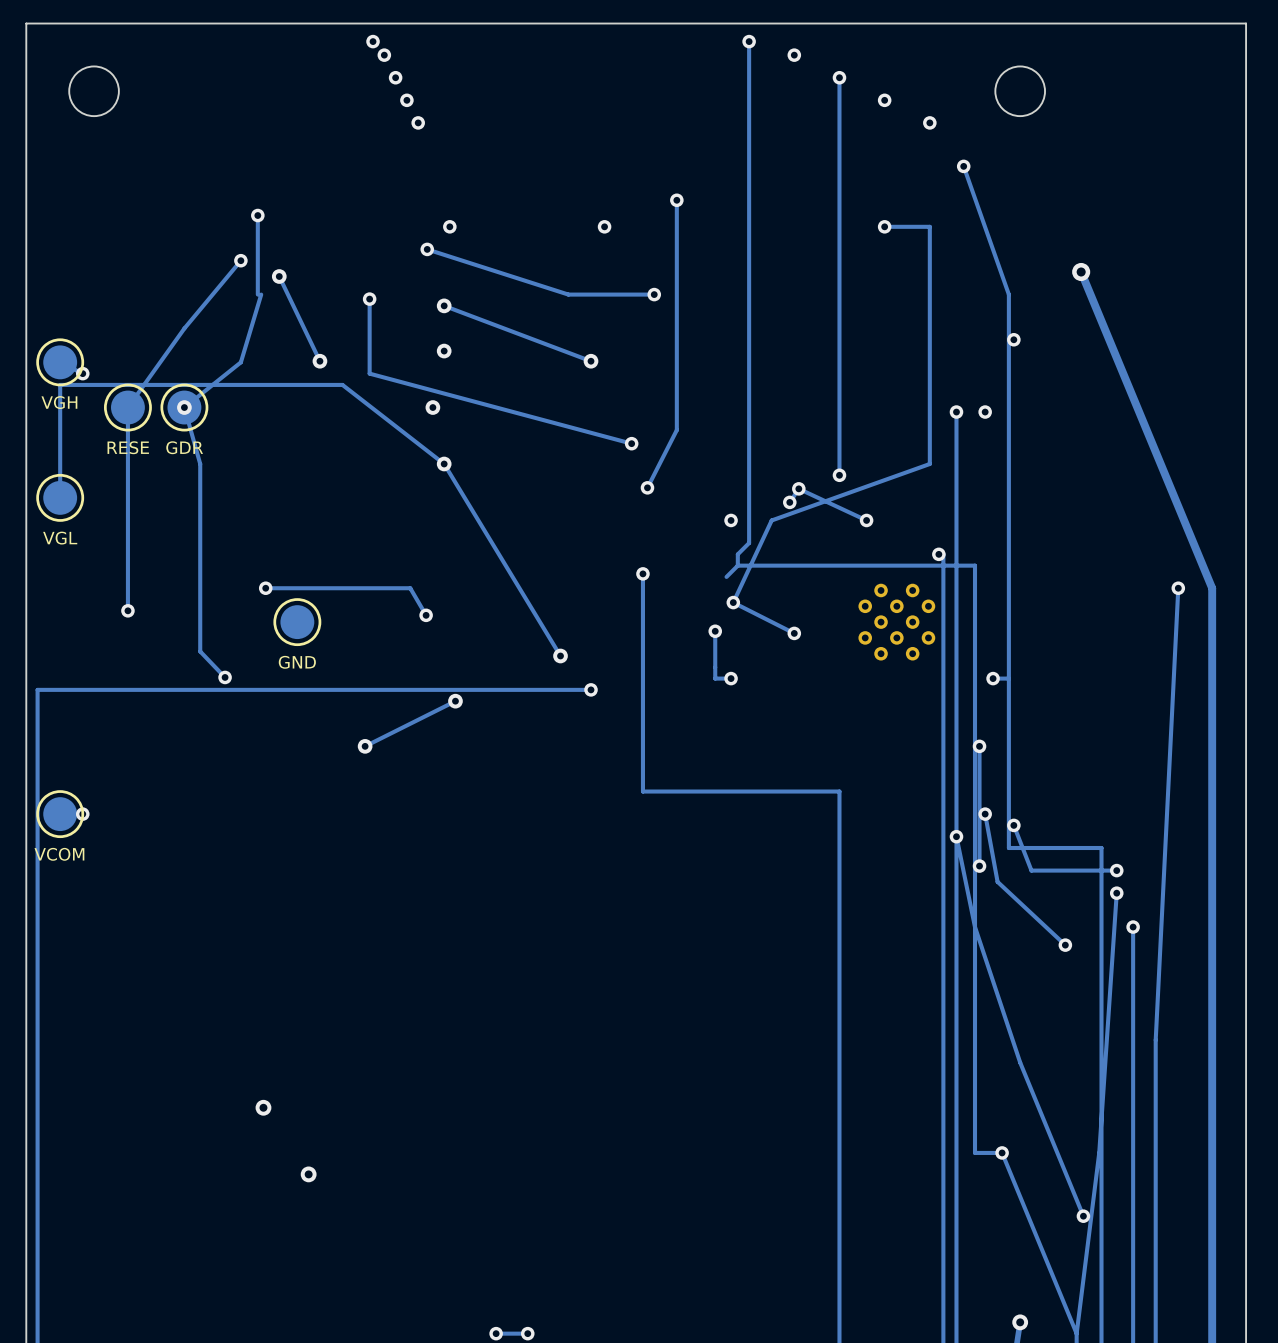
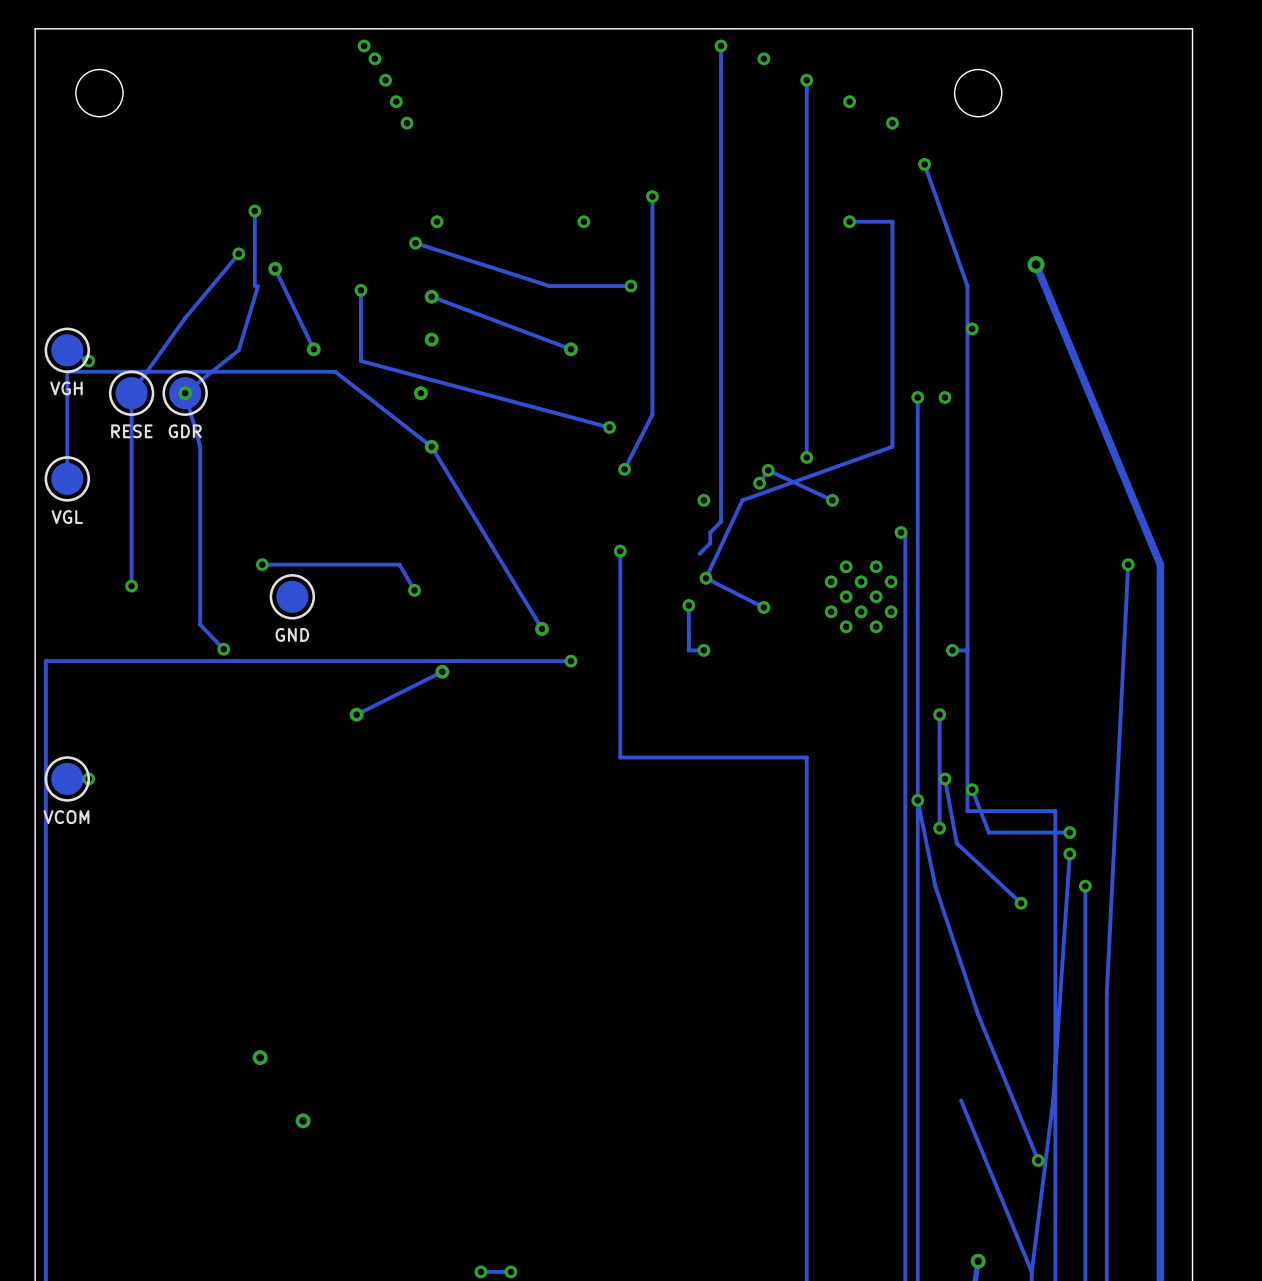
track: (737, 565) (975, 565) (975, 1152) (1002, 1152) -> none
via: (1002, 1152) -> none

